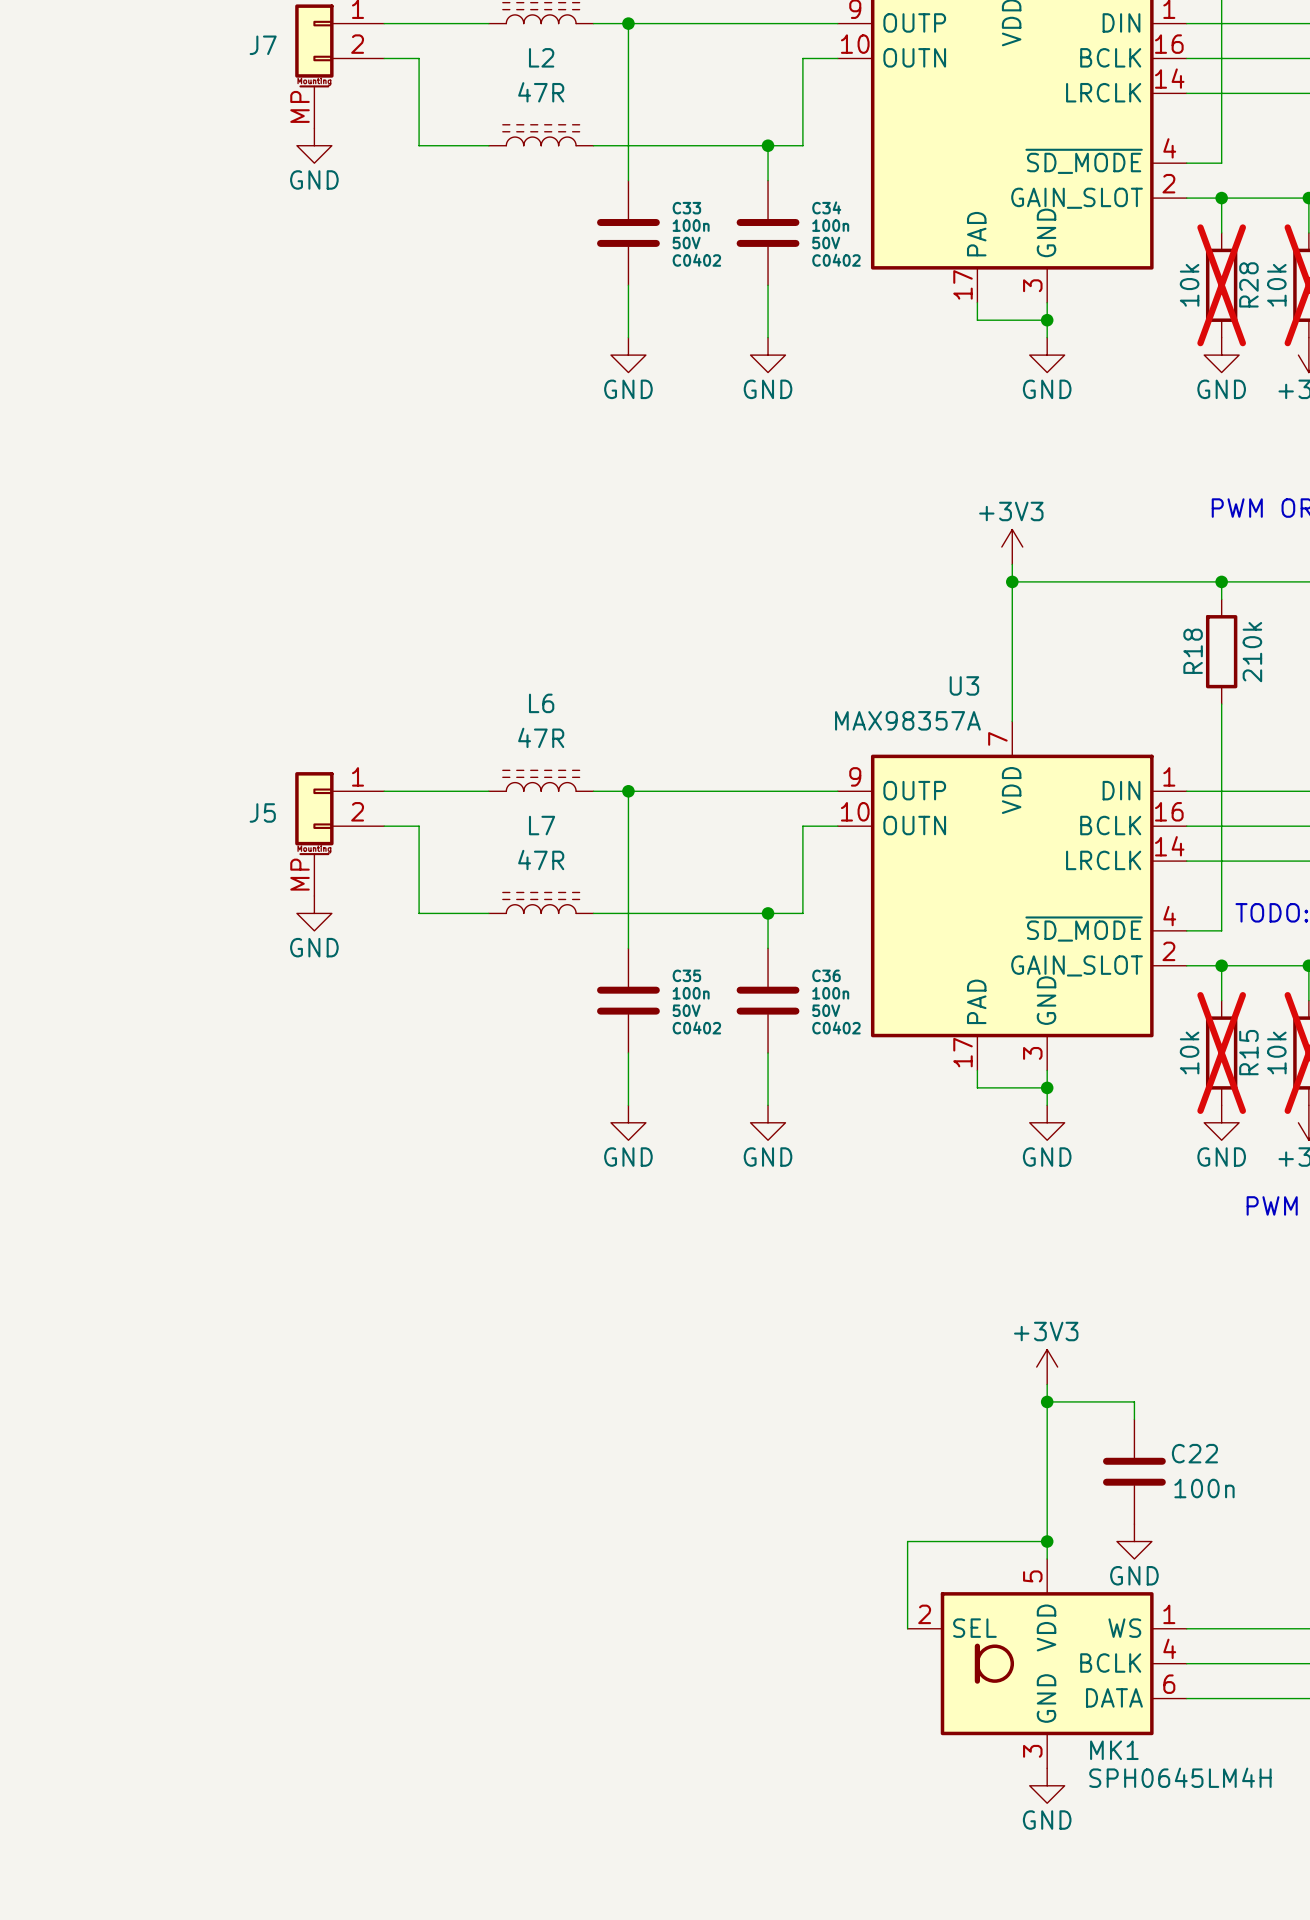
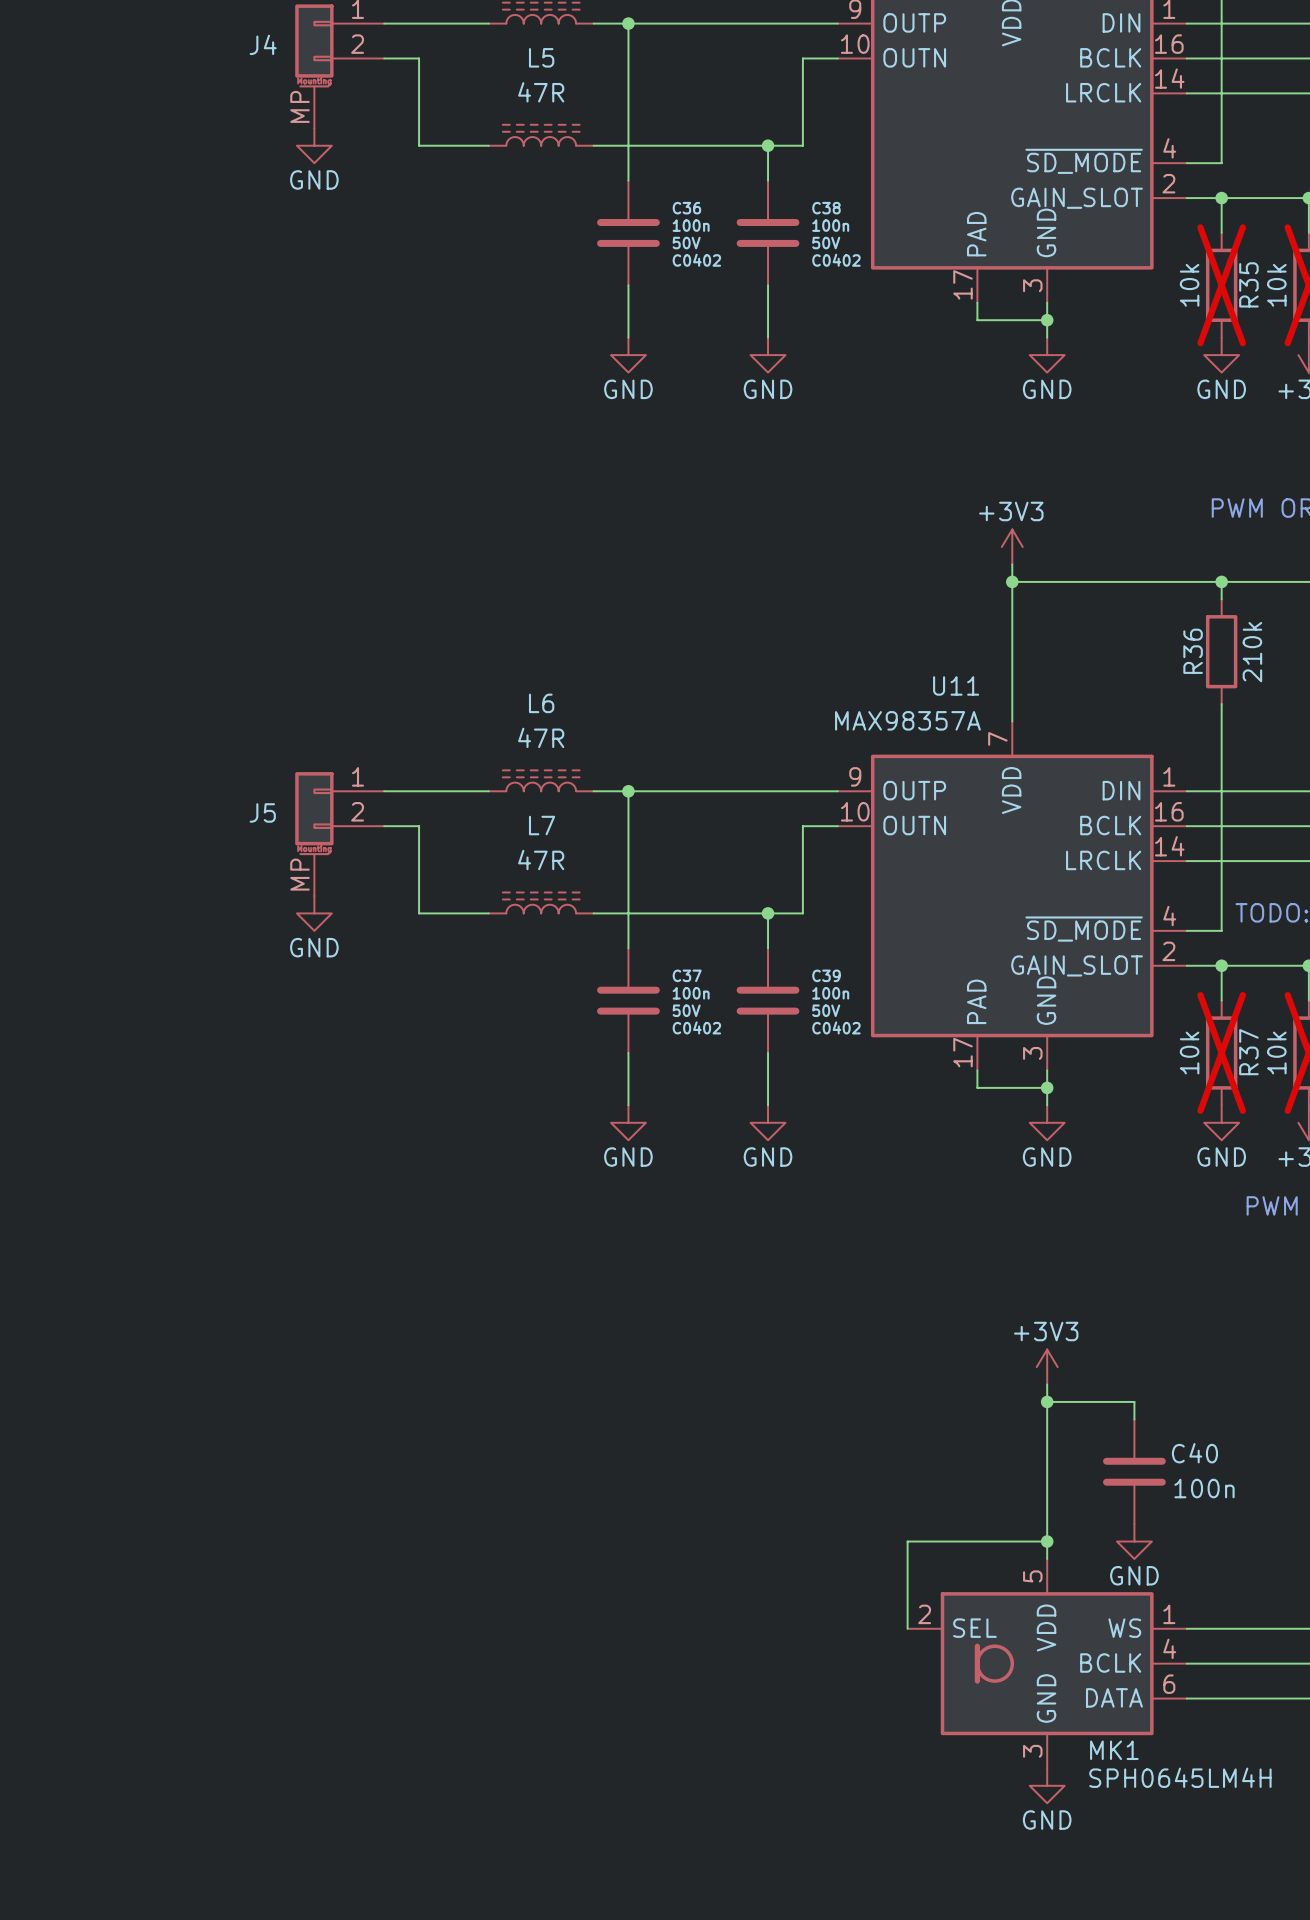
J7 name: J7 (263, 45) -> J4 (263, 44)
L2 name: L2 (541, 57) -> L5 (541, 57)
C34 name: C34 (826, 207) -> C38 (826, 208)
C33 name: C33 (686, 208) -> C36 (686, 208)
R28 name: R28 (1248, 284) -> R35 (1248, 284)
R18 name: R18 (1193, 651) -> R36 (1193, 651)
U3 name: U3 (964, 685) -> U11 (956, 685)
C35 name: C35 (686, 975) -> C37 (687, 975)
C36 name: C36 (826, 975) -> C39 (826, 975)
R15 name: R15 (1248, 1052) -> R37 (1248, 1052)
C22 name: C22 (1194, 1453) -> C40 (1194, 1453)

